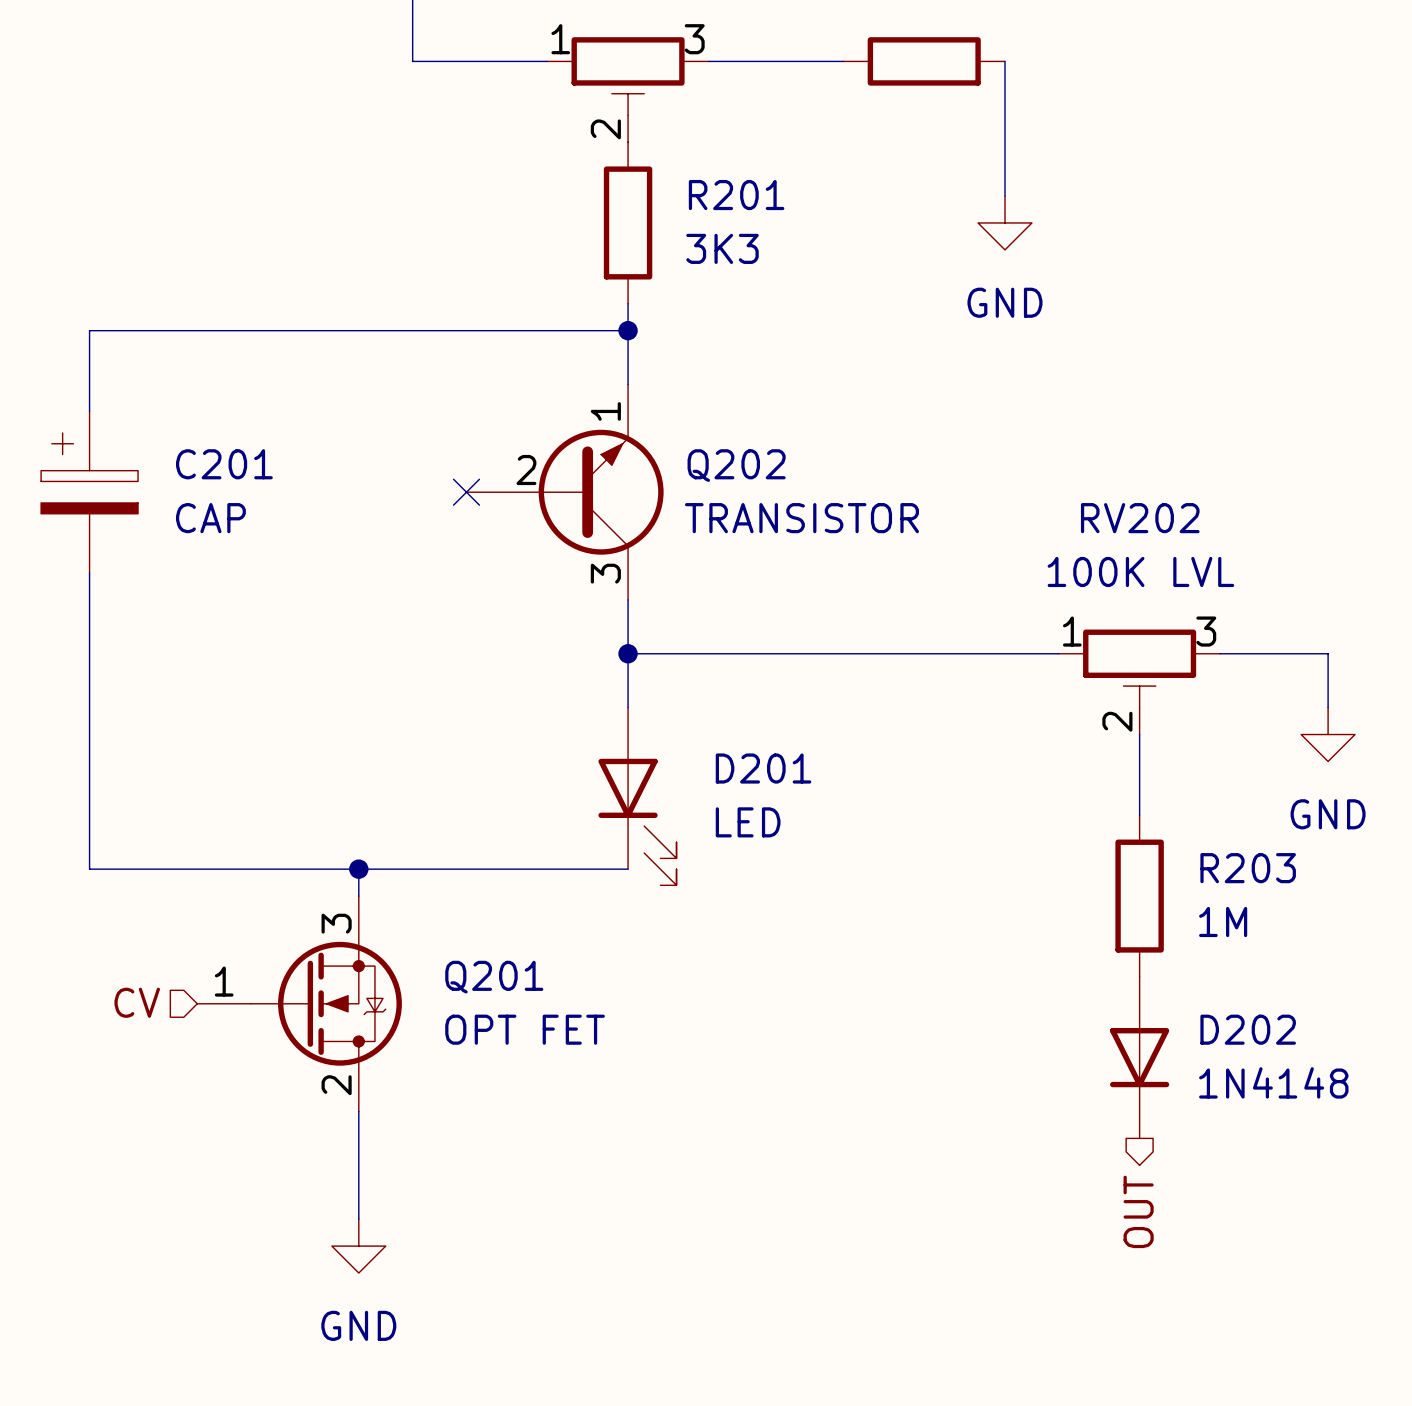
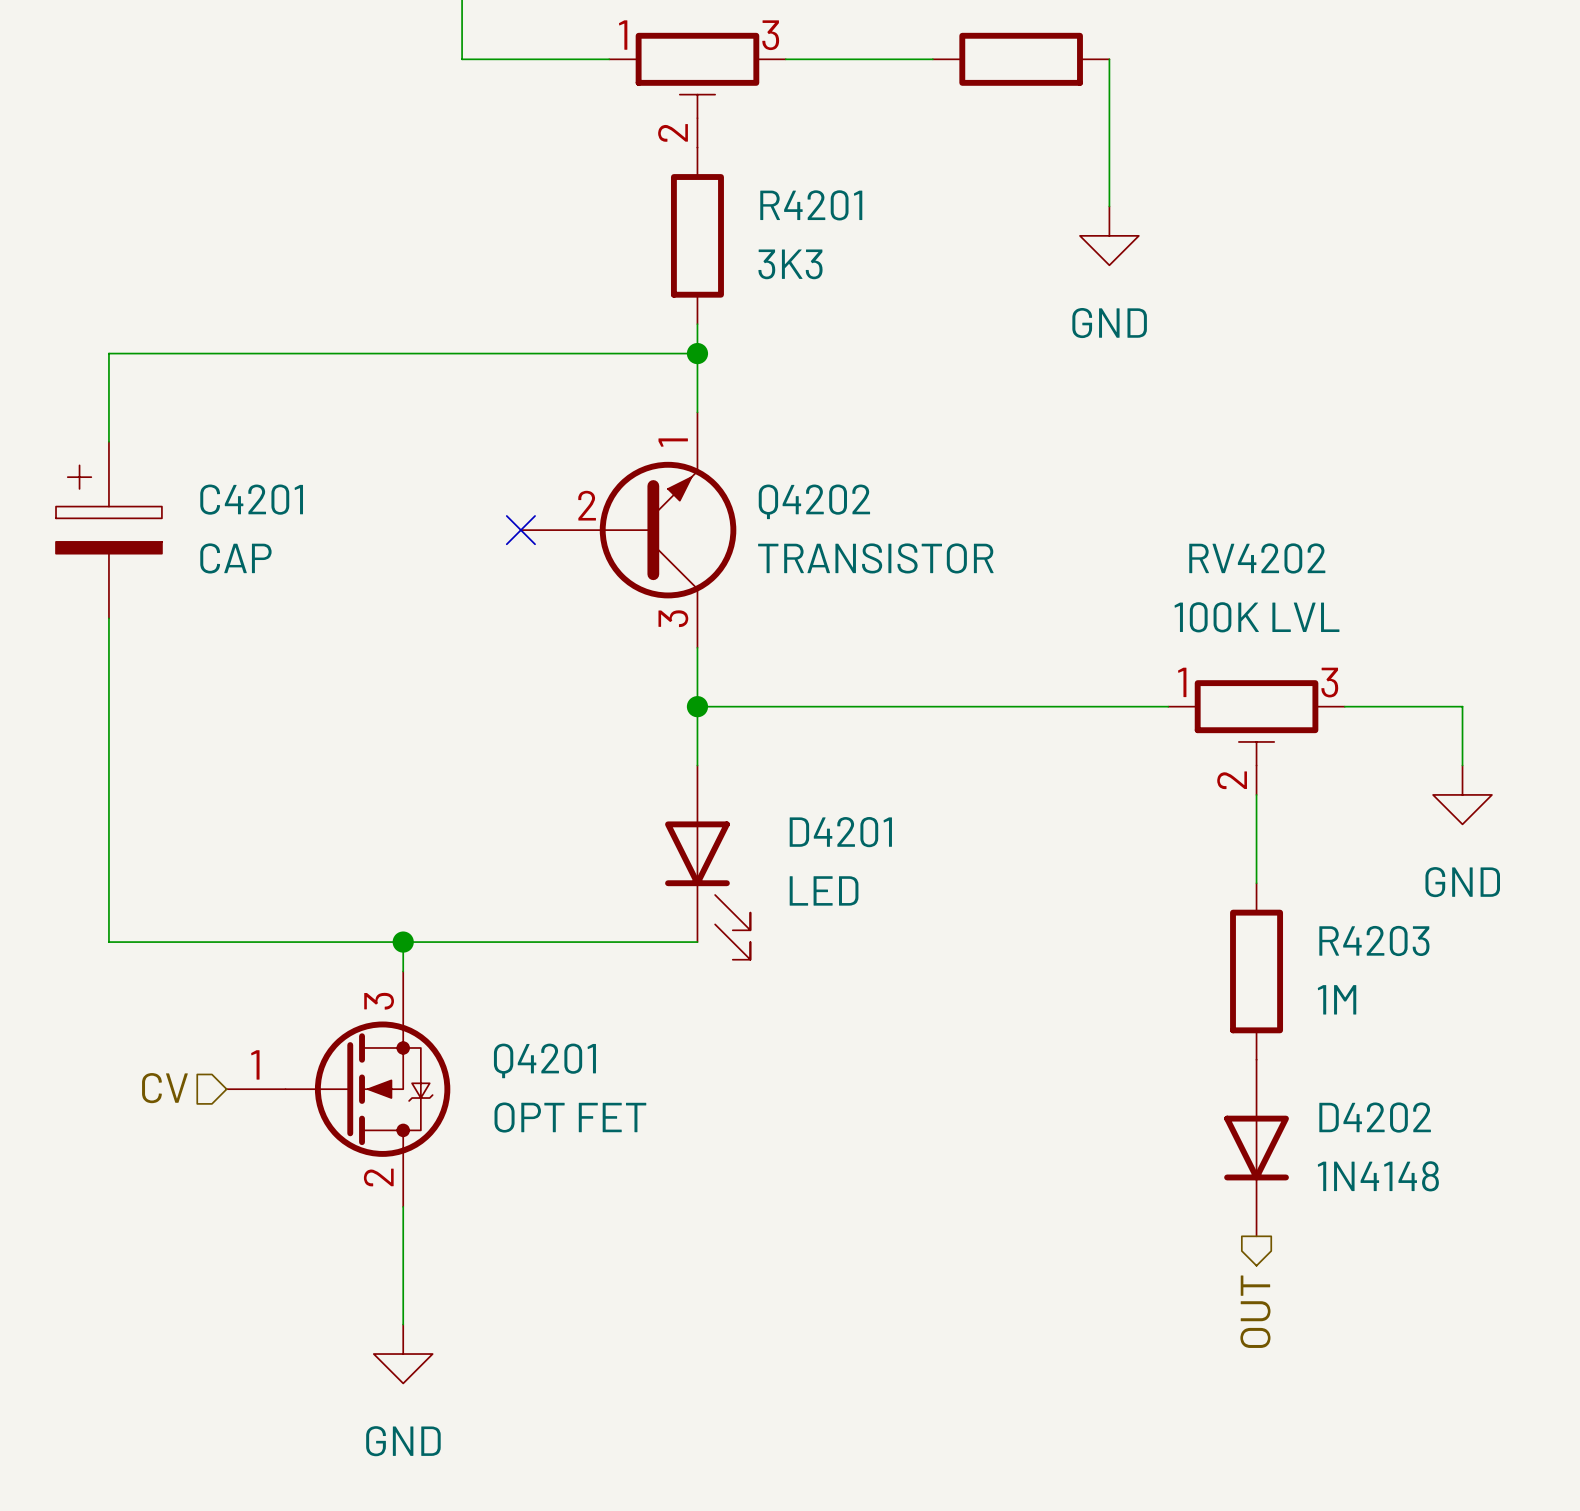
R201 name: R201 (736, 195) -> R4201 (811, 205)
C201 name: C201 (224, 464) -> C4201 (251, 499)
Q202 name: Q202 (736, 465) -> Q4202 (814, 501)
RV202 name: RV202 (1140, 518) -> RV4202 (1257, 558)
D201 name: D201 (763, 768) -> D4201 (840, 832)
R203 name: R203 (1248, 868) -> R4203 (1374, 940)
Q201 name: Q201 (494, 977) -> Q4201 (544, 1060)
D202 name: D202 (1248, 1029) -> D4202 (1375, 1117)

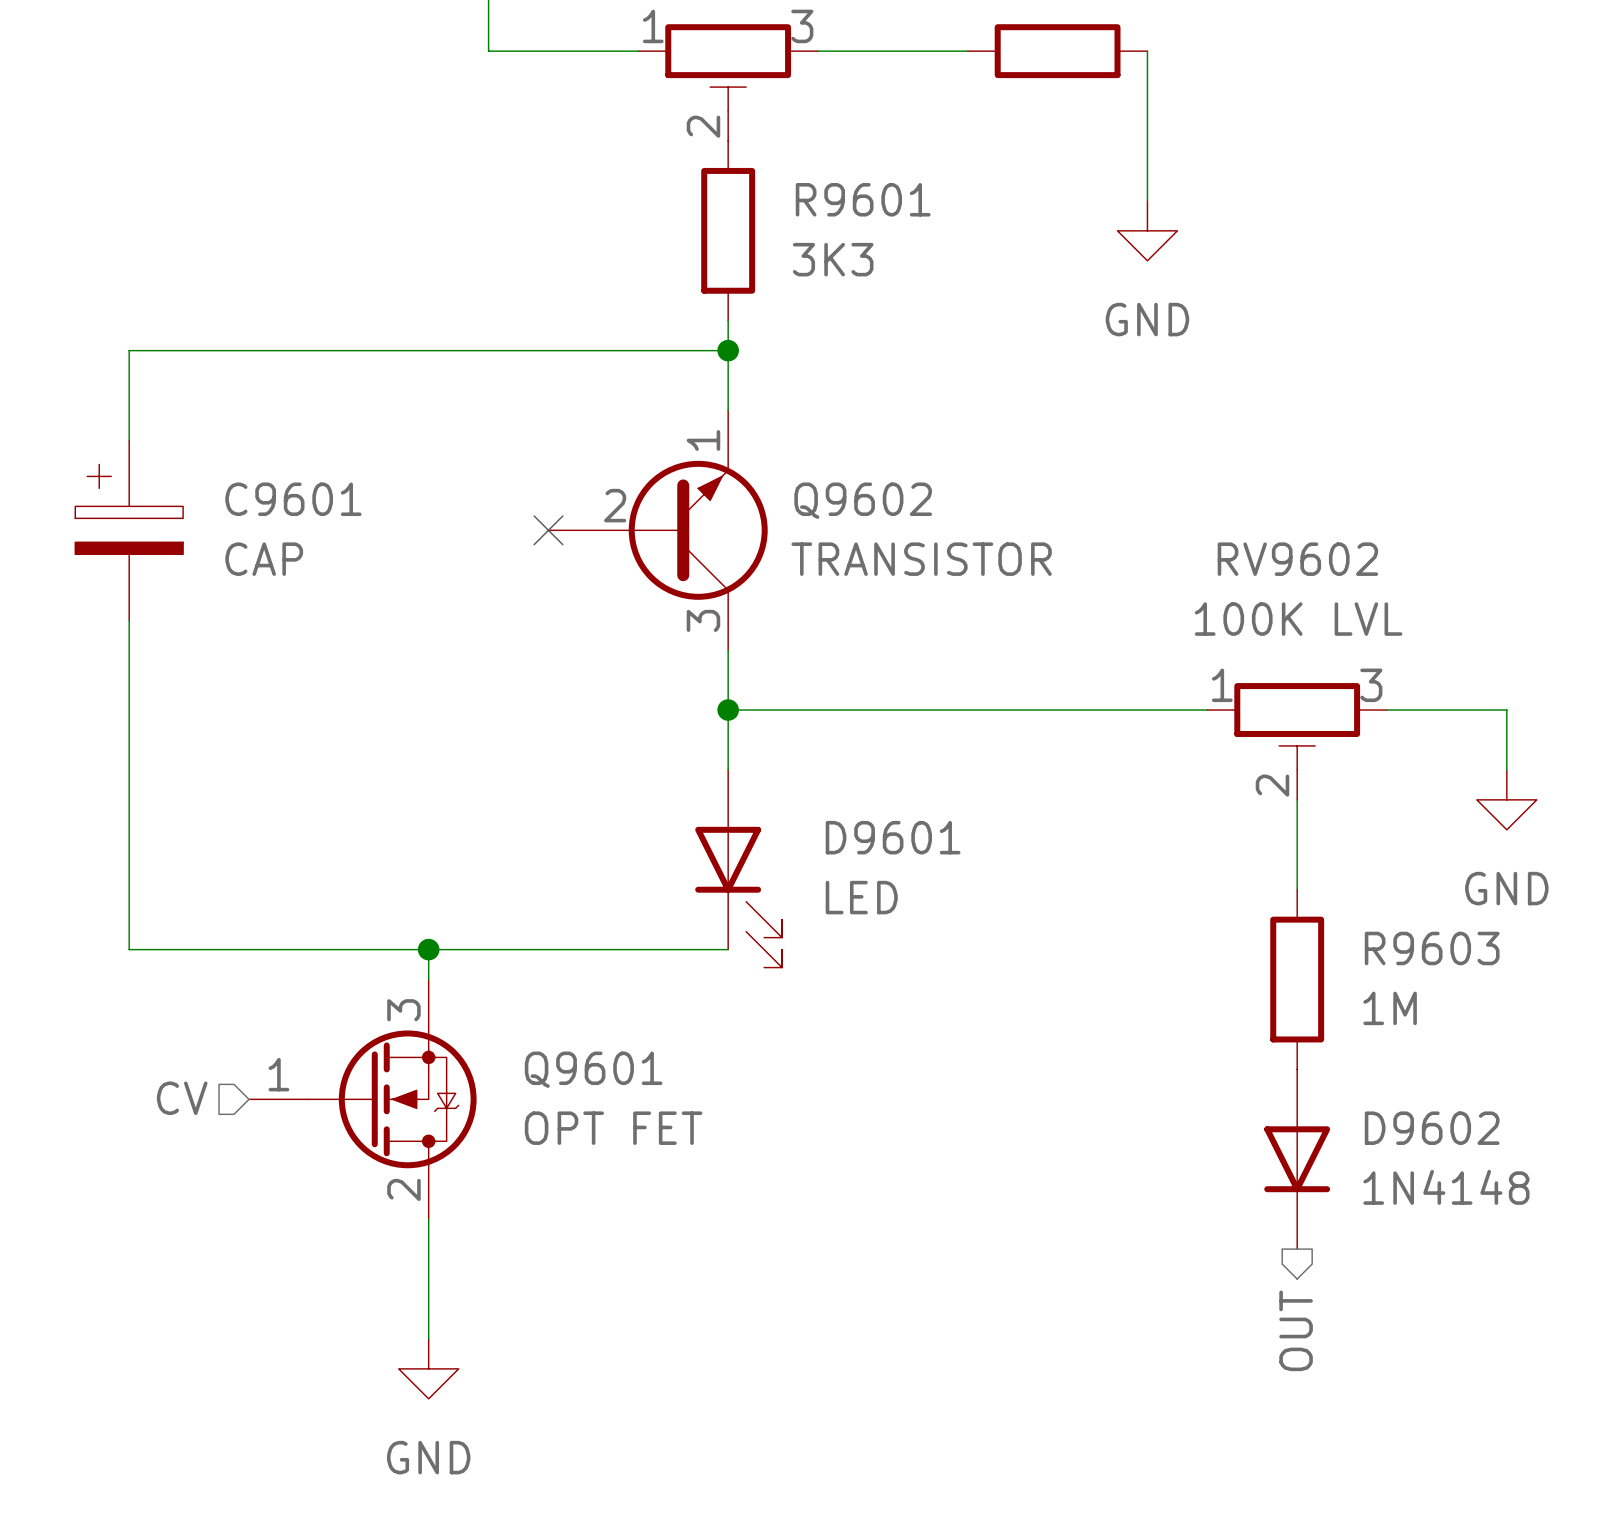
R4201 name: R4201 (811, 205) -> R9601 (863, 199)
C4201 name: C4201 (251, 499) -> C9601 (293, 499)
Q4202 name: Q4202 (814, 501) -> Q9602 (863, 500)
RV4202 name: RV4202 (1257, 558) -> RV9602 (1297, 559)
D4201 name: D4201 (840, 832) -> D9601 (893, 837)
R4203 name: R4203 (1374, 940) -> R9603 (1432, 948)
Q4201 name: Q4201 (544, 1060) -> Q9601 (593, 1069)
D4202 name: D4202 (1375, 1117) -> D9602 (1432, 1128)

